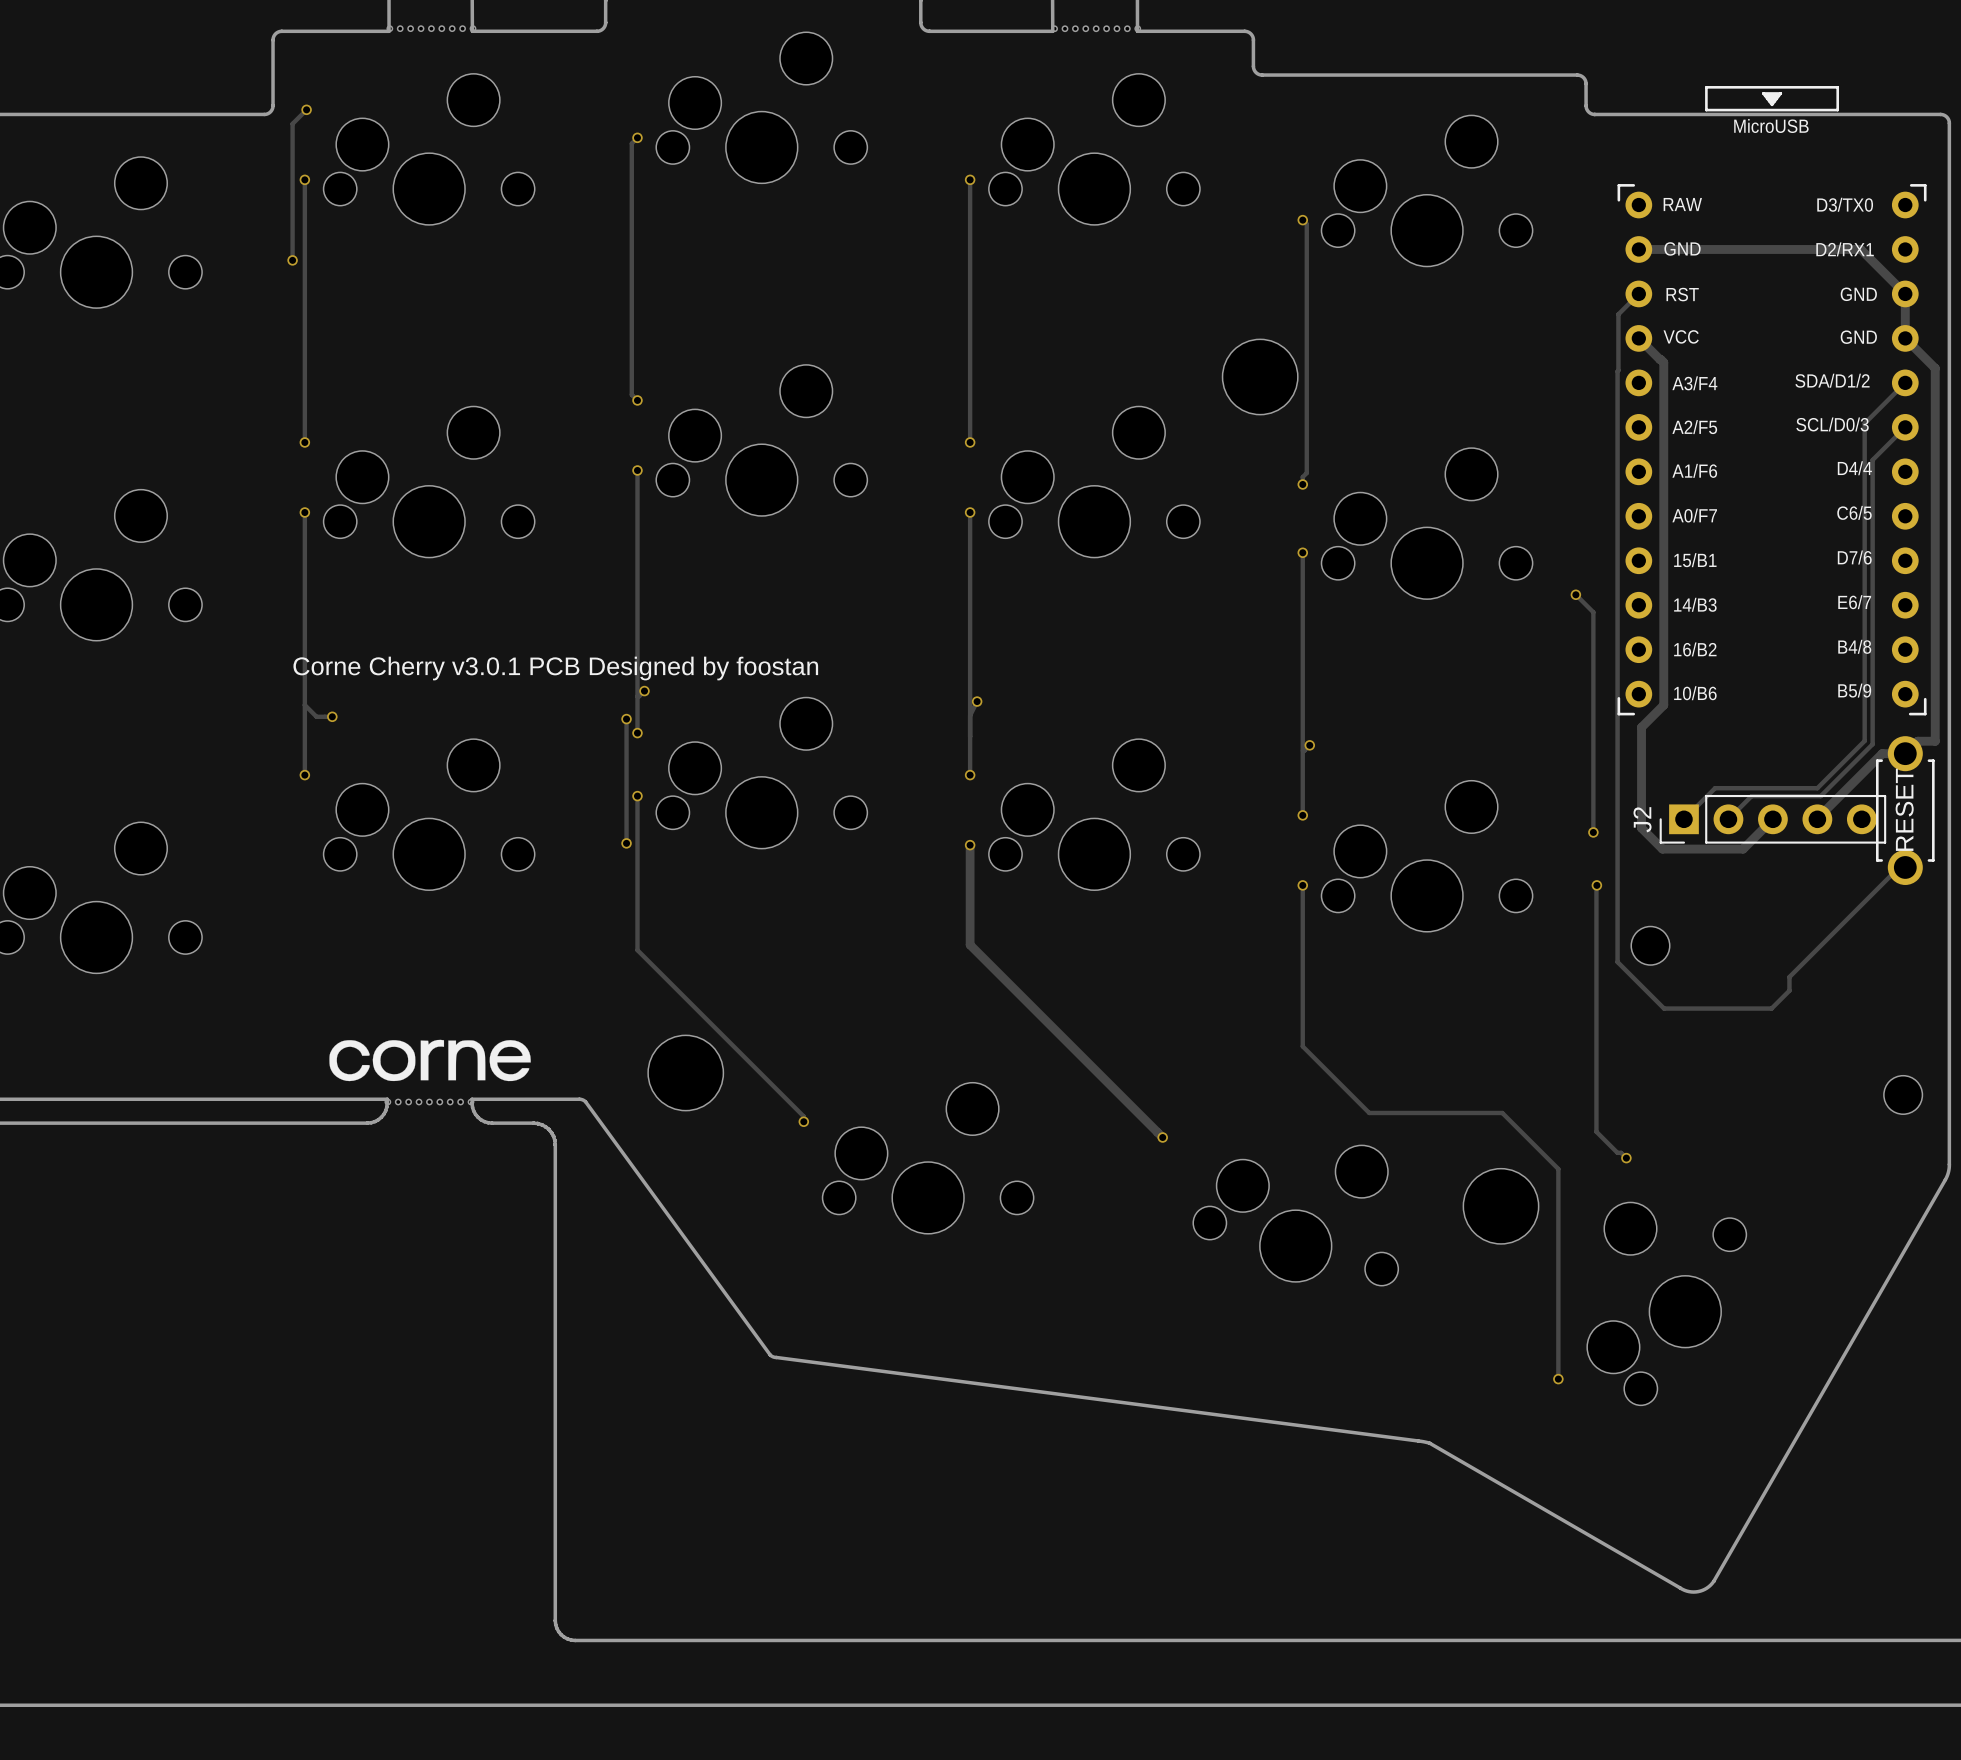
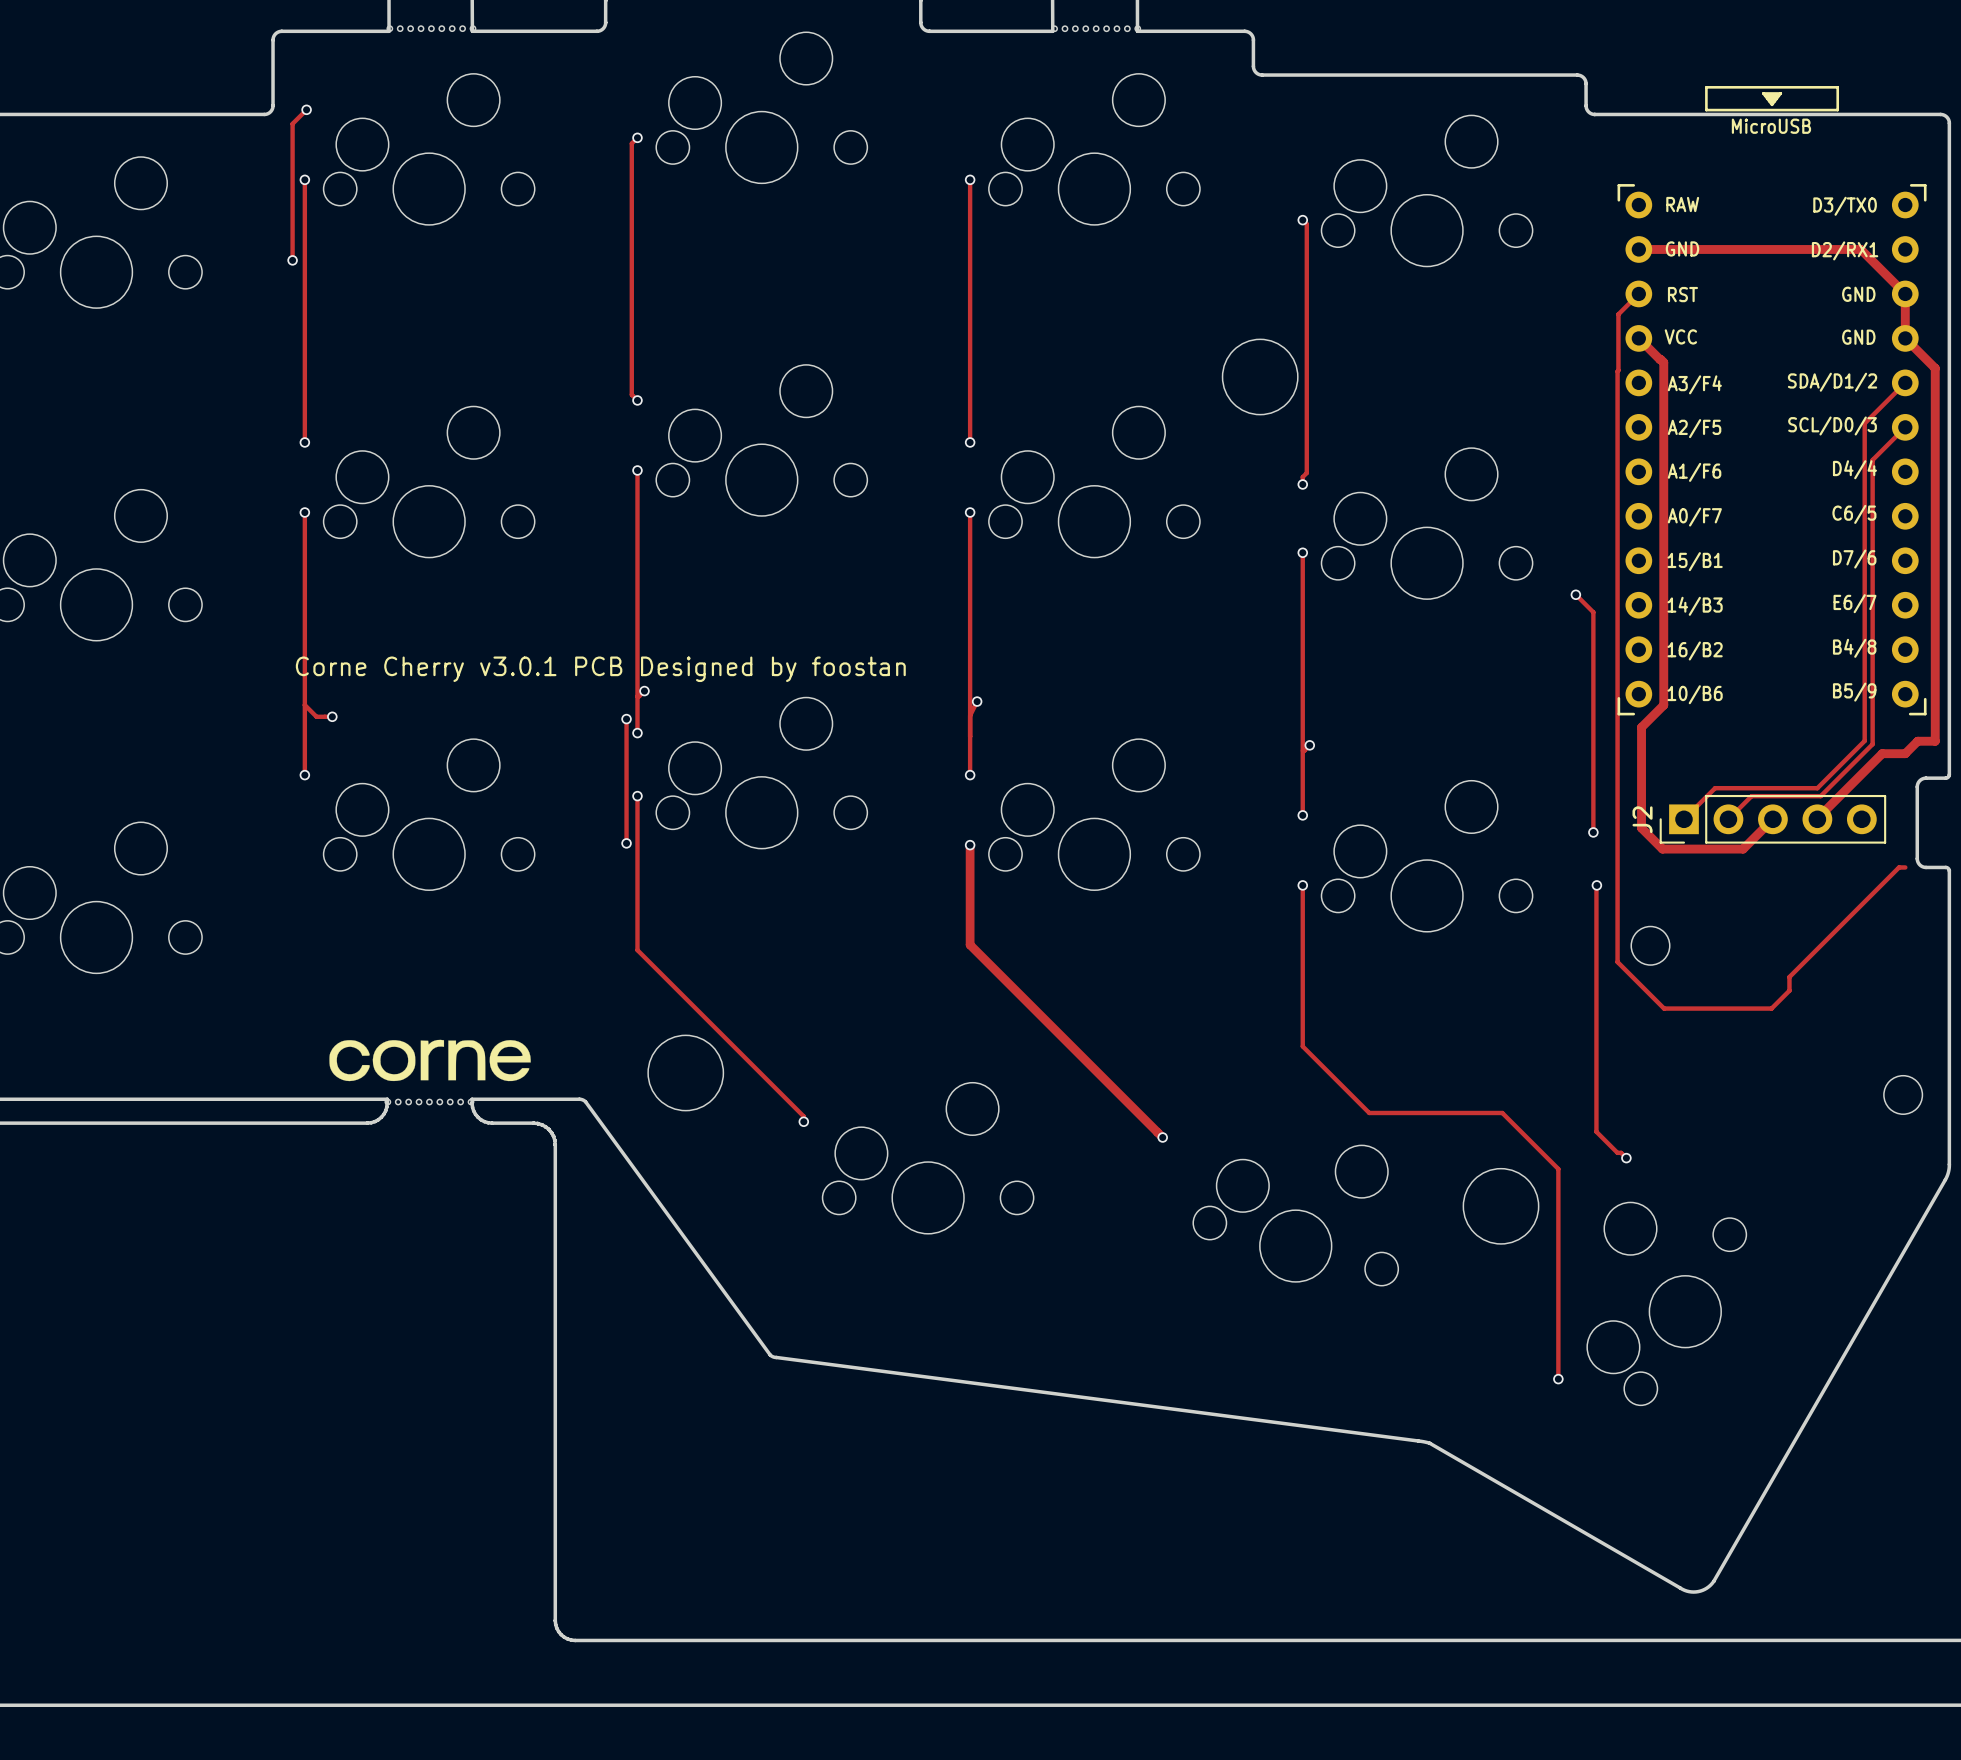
board edge: (1949, 775) (1949, 870) -> (1949, 774) (1946, 778) (1923, 778) (1917, 783) (1917, 858) (1922, 866) (1946, 867) (1949, 870)
part: (1905, 810) -> none

